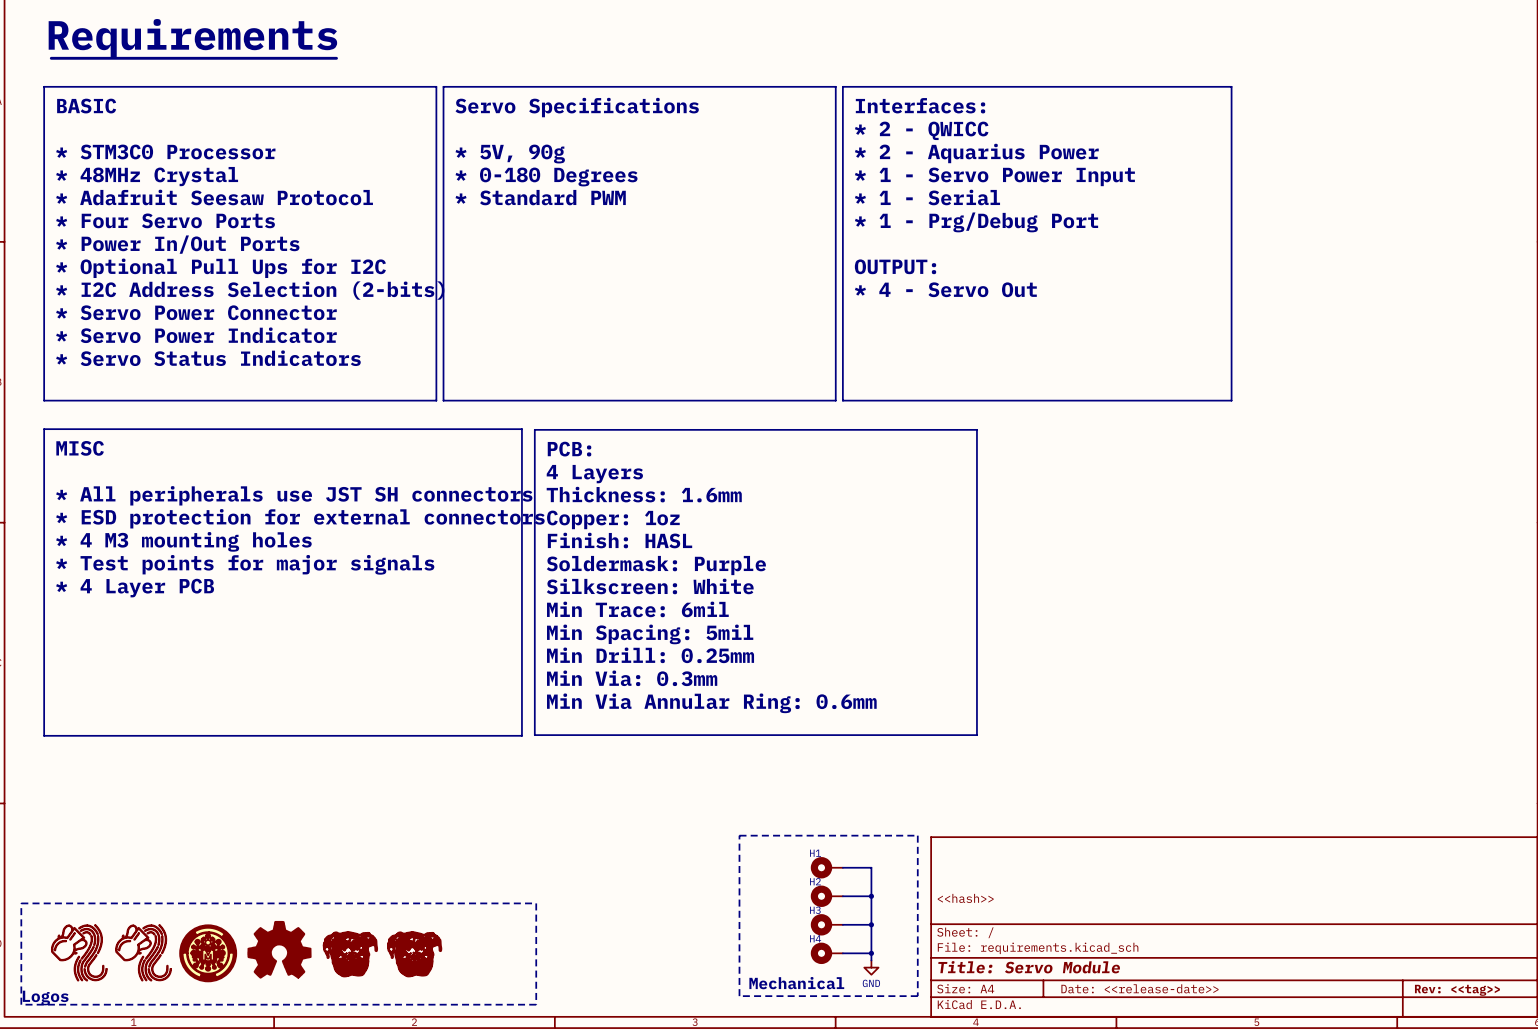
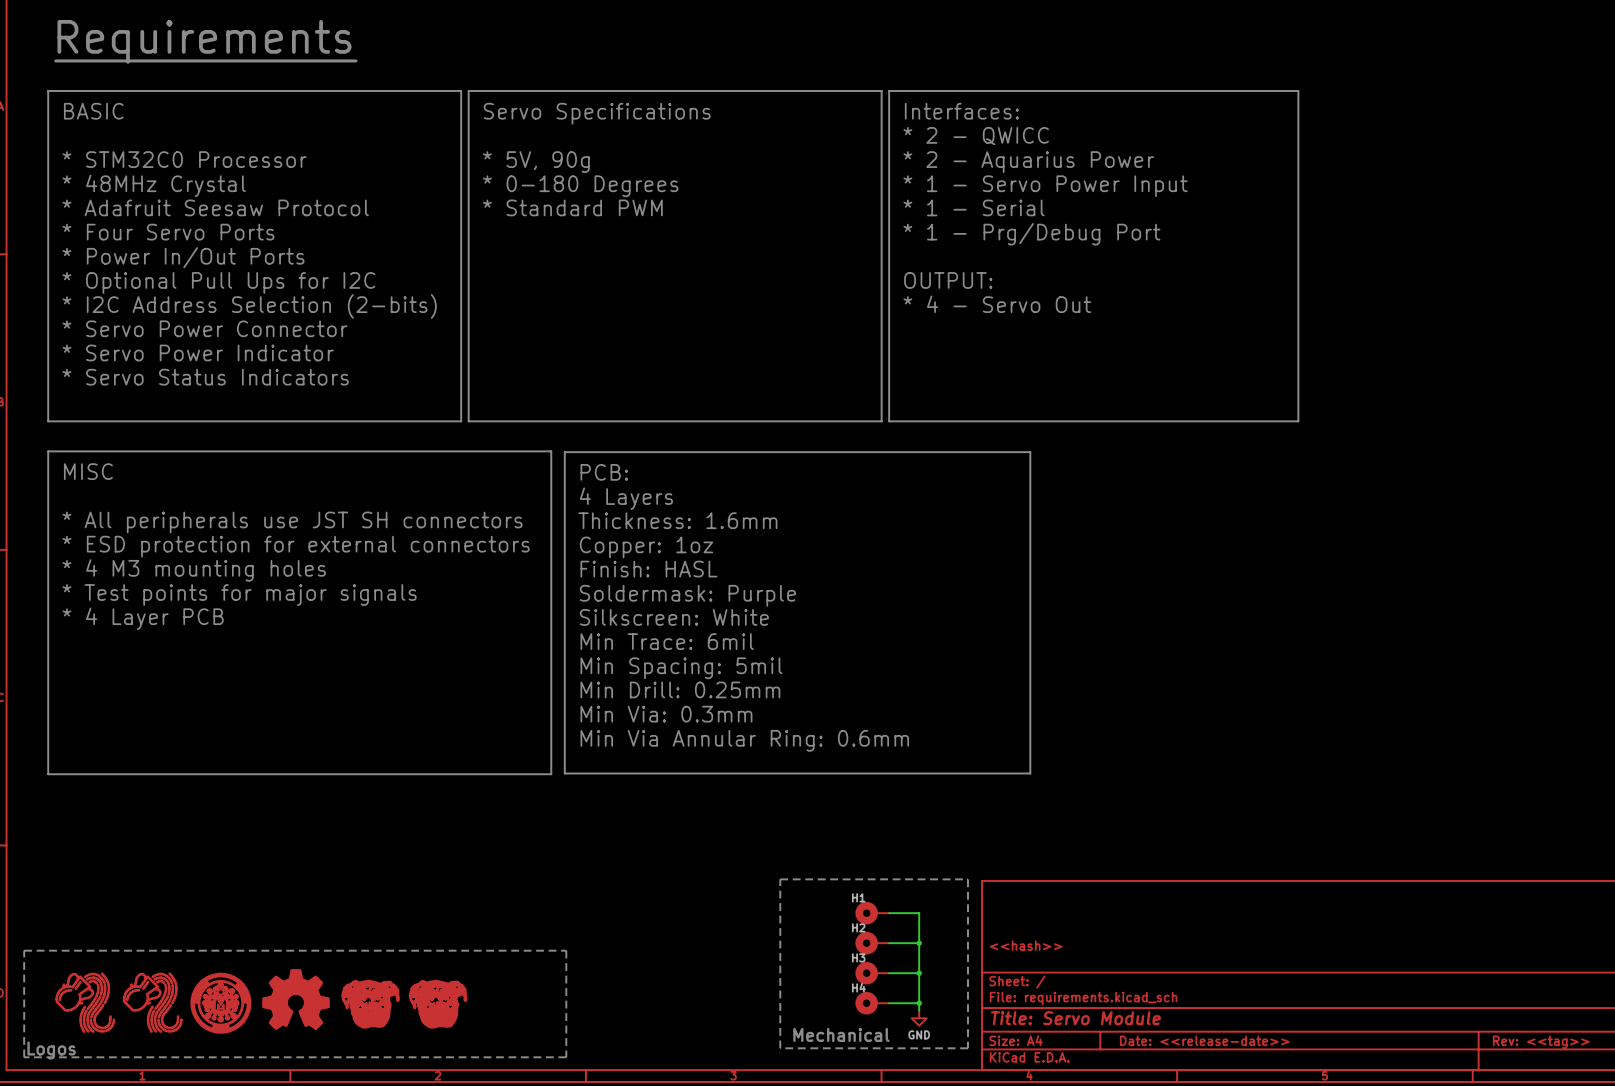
text: * STM3C0 Processor (165, 151) -> * STM32C0 Processor (184, 159)

